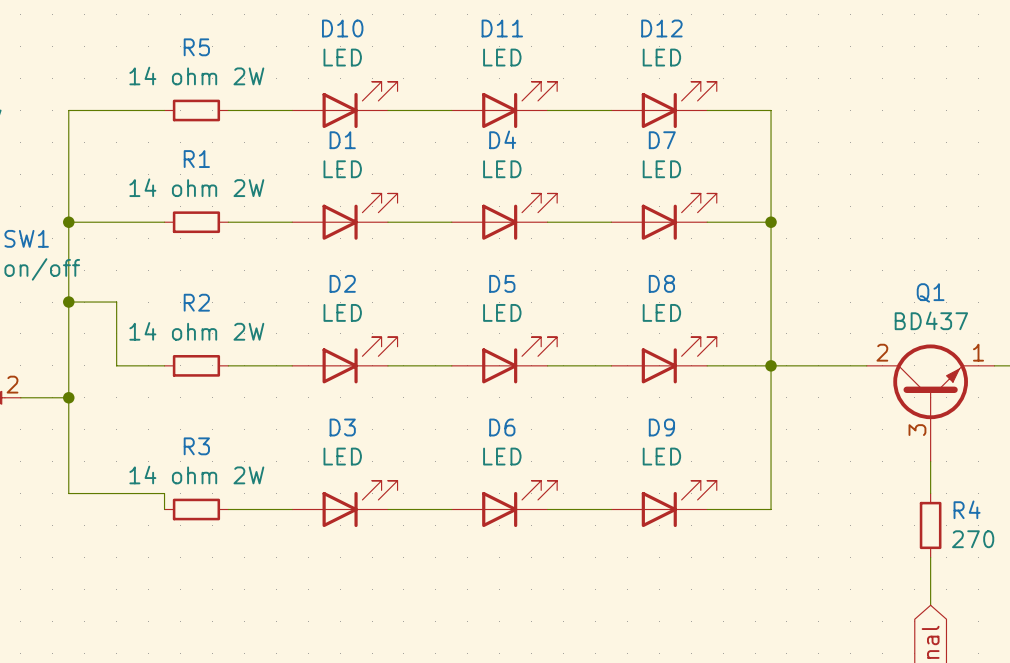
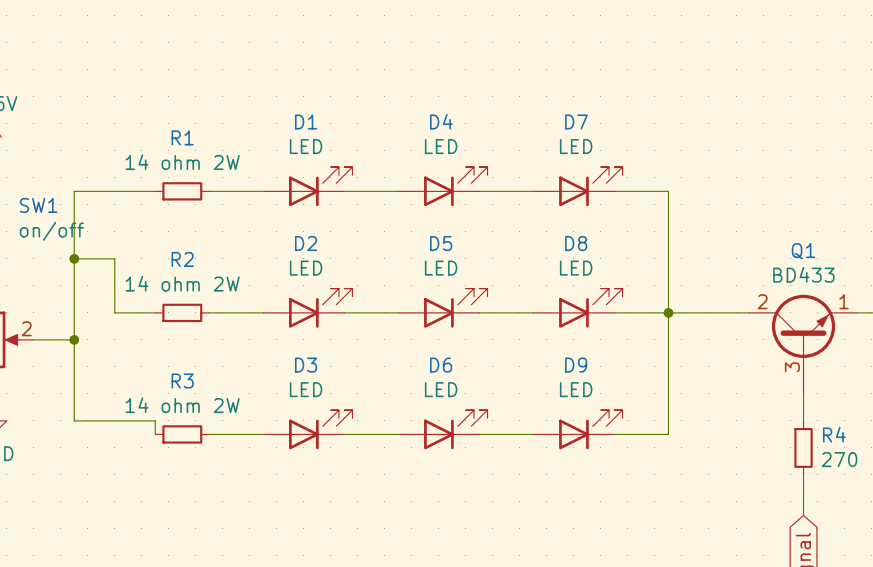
D10: LED (344, 104) -> none
D11: LED (504, 104) -> none
D12: LED (664, 104) -> none
wire: (164, 110) (68, 110) (68, 222) -> none
R5: 14 ohm 2W (196, 110) -> none
wire: (228, 110) (292, 110) -> none
wire: (387, 110) (451, 110) -> none
wire: (547, 110) (611, 110) -> none
wire: (707, 110) (771, 110) (771, 222) -> none
junction: (68, 222) -> none
junction: (771, 222) -> none
Q1 value: BD437 (931, 320) -> BD433 (803, 274)

